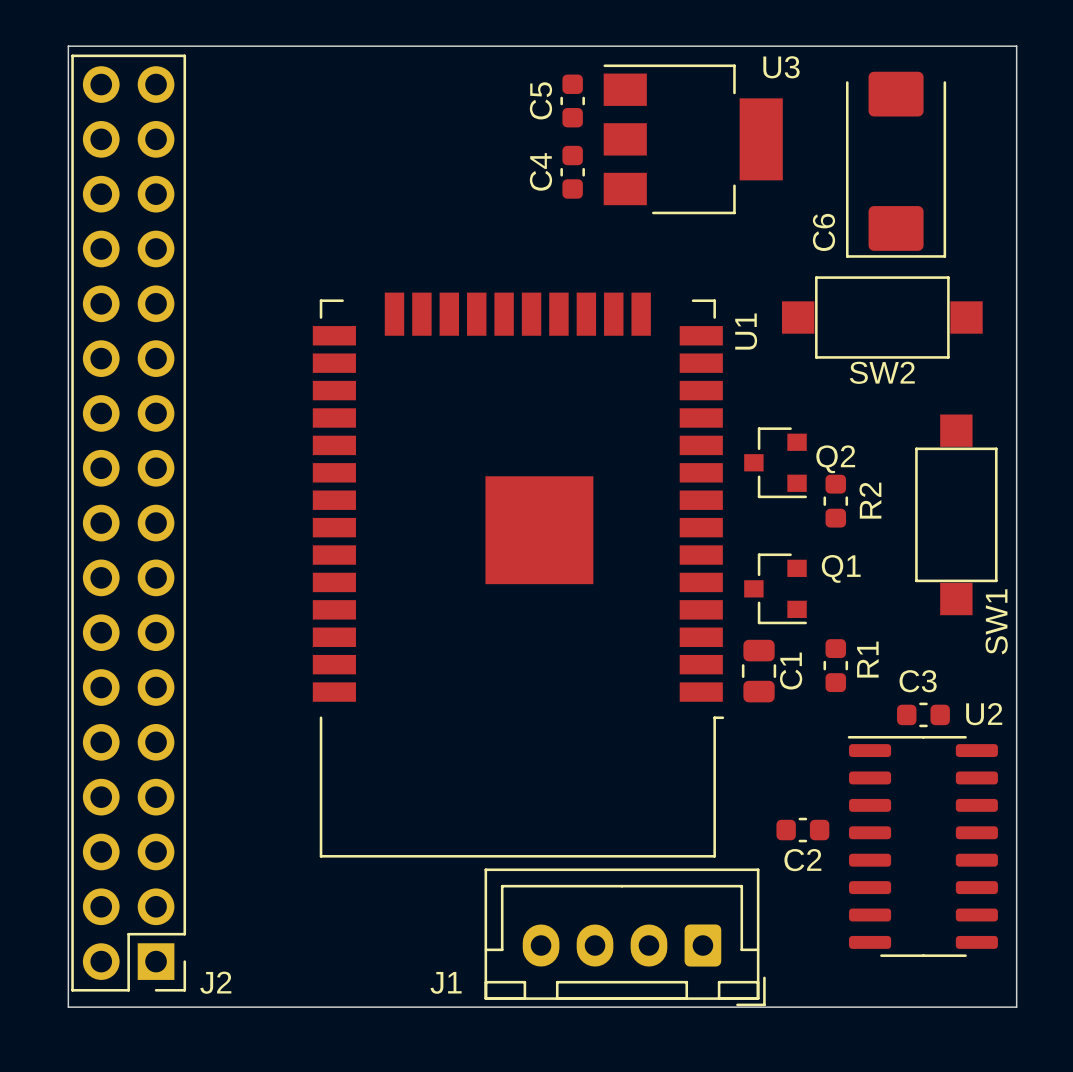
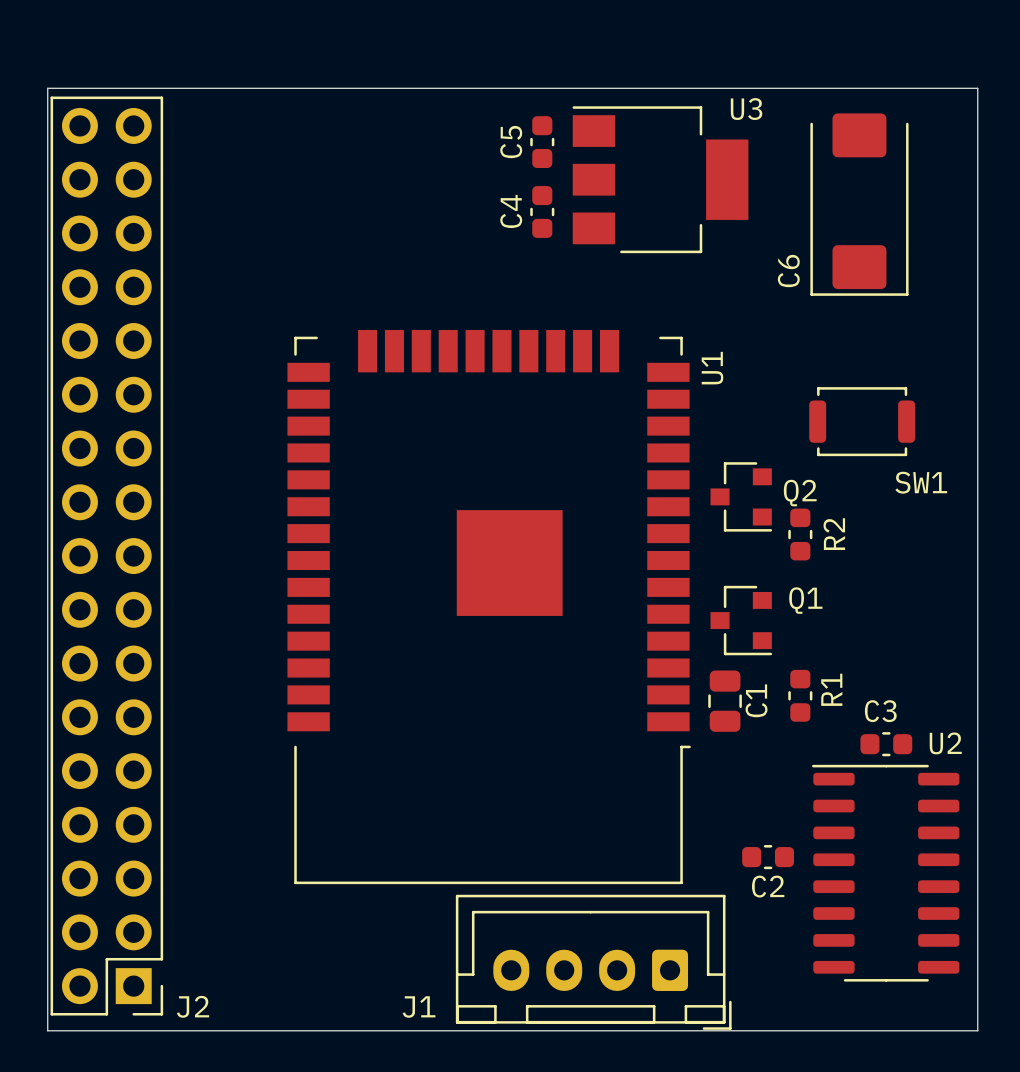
SW2: (882, 317) -> none
SW1 footprint: [915, 414, 998, 616] -> [809, 387, 916, 457]
SW1 name position: SW1 (996, 621) -> SW1 (921, 482)

